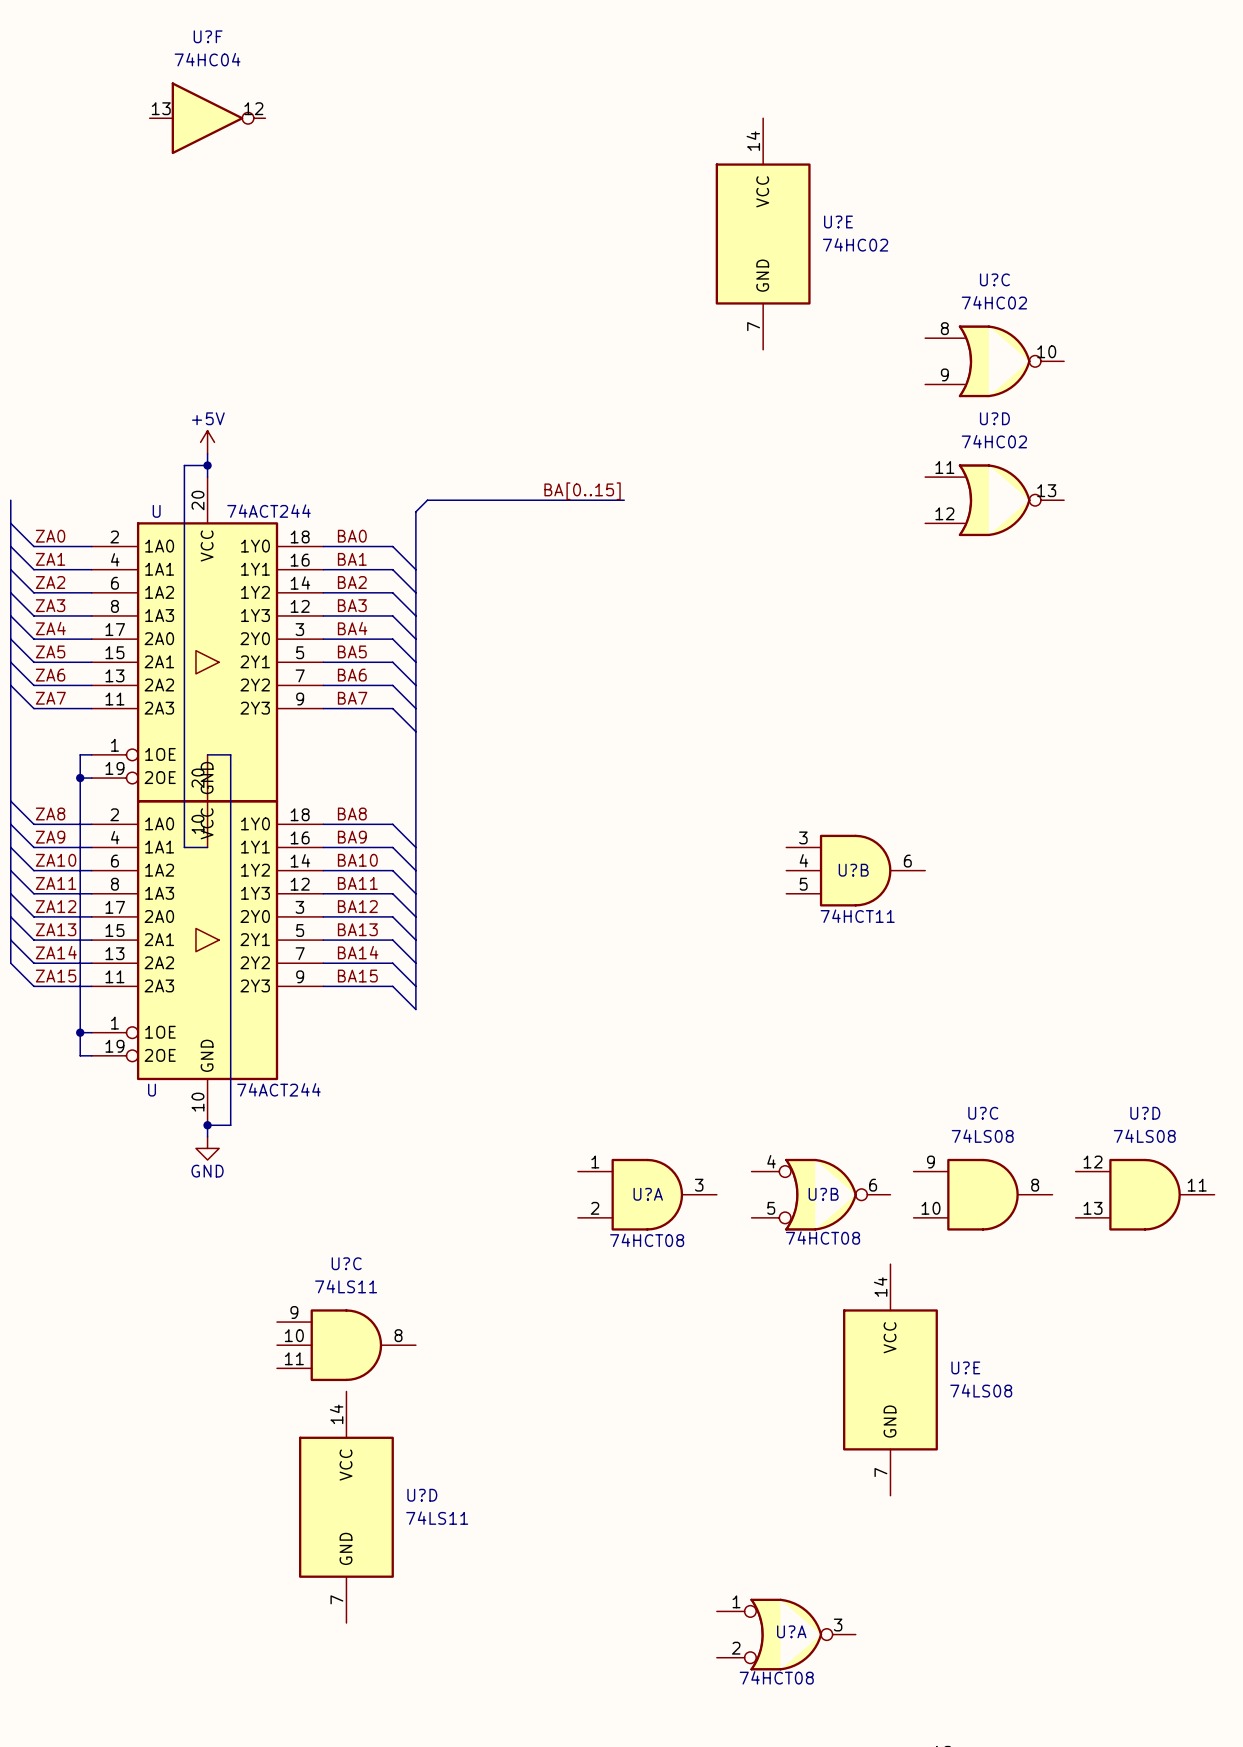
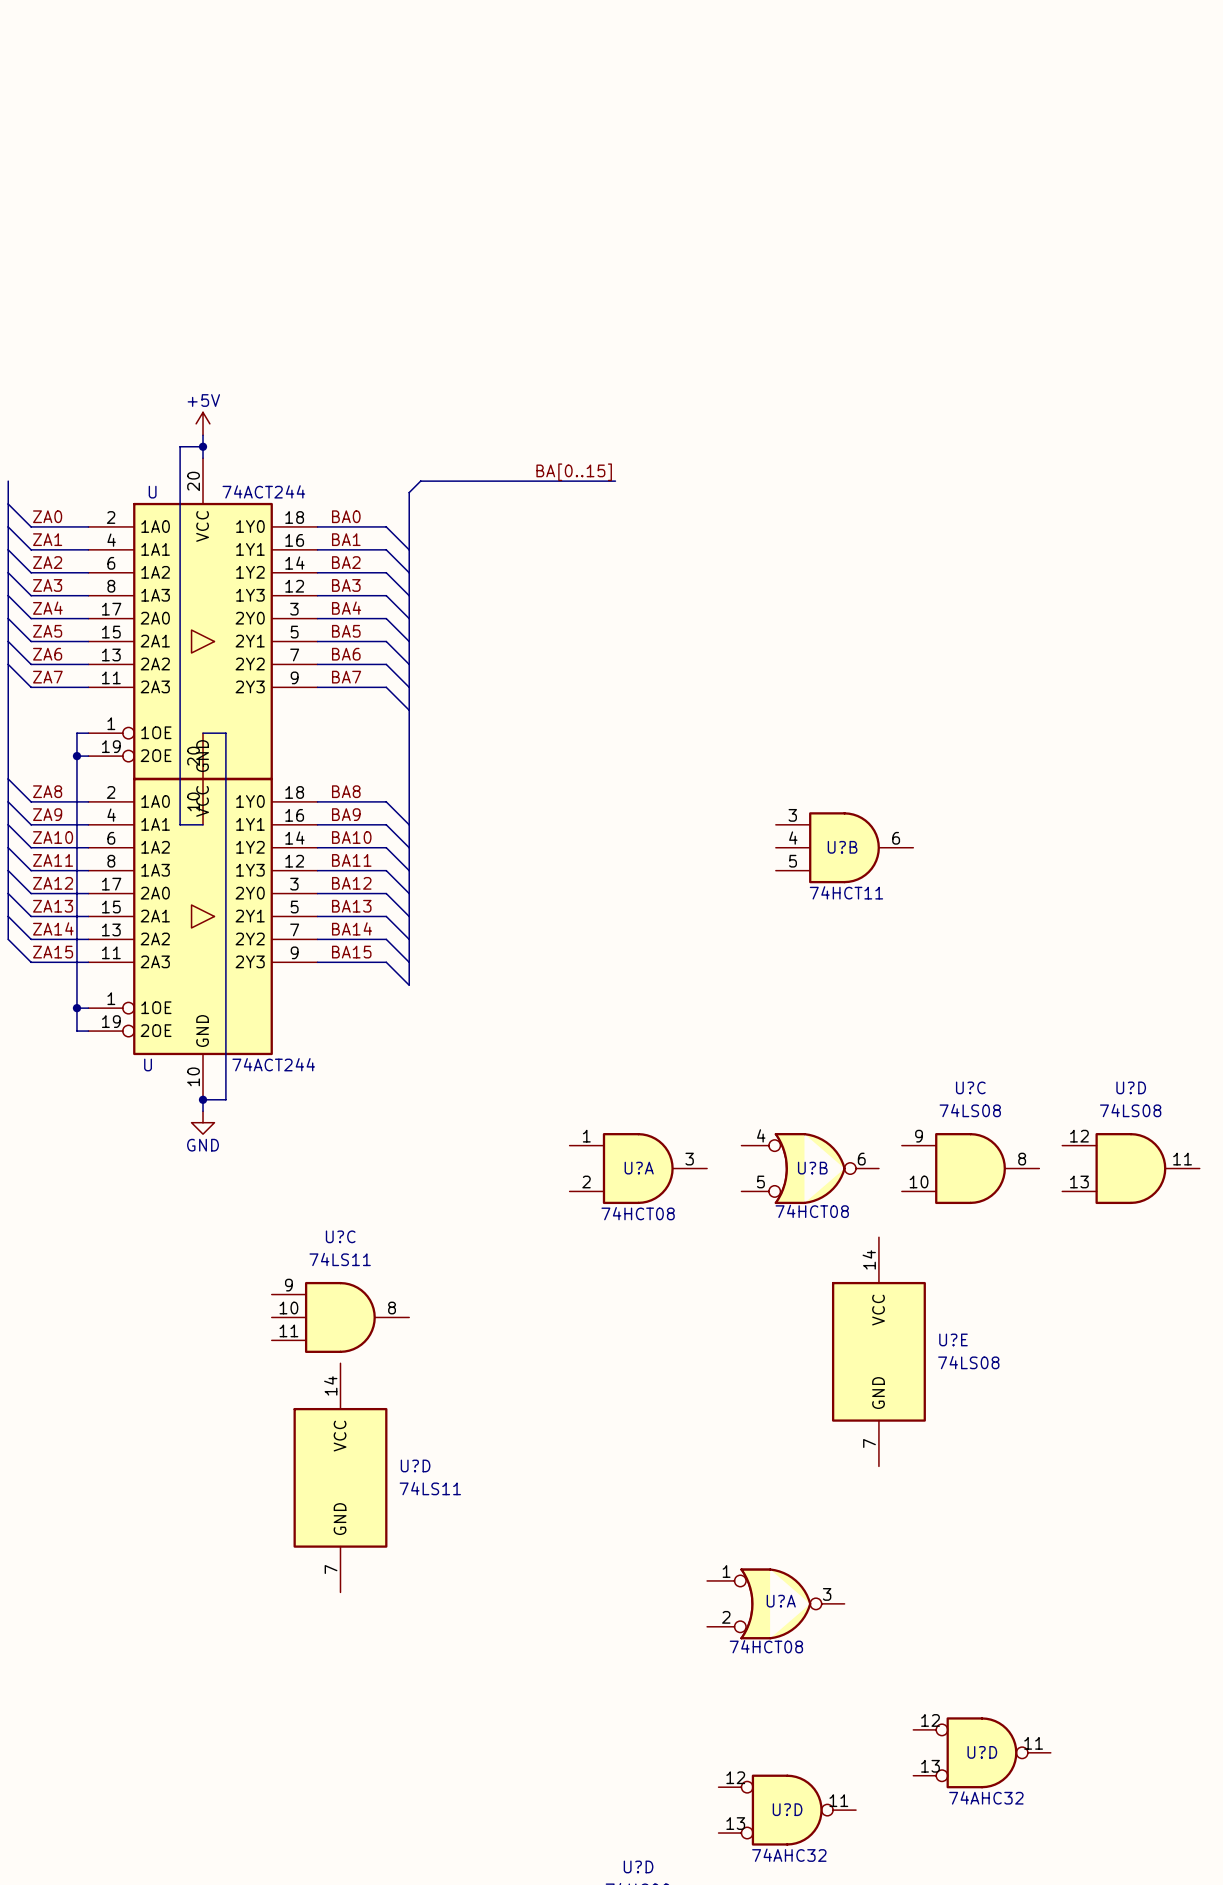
U?F: 74HC04 (207, 118) -> none
U?E: 74HC02 (763, 234) -> none
U?C: 74HC02 (994, 361) -> none
U?D: 74HC02 (994, 500) -> none

